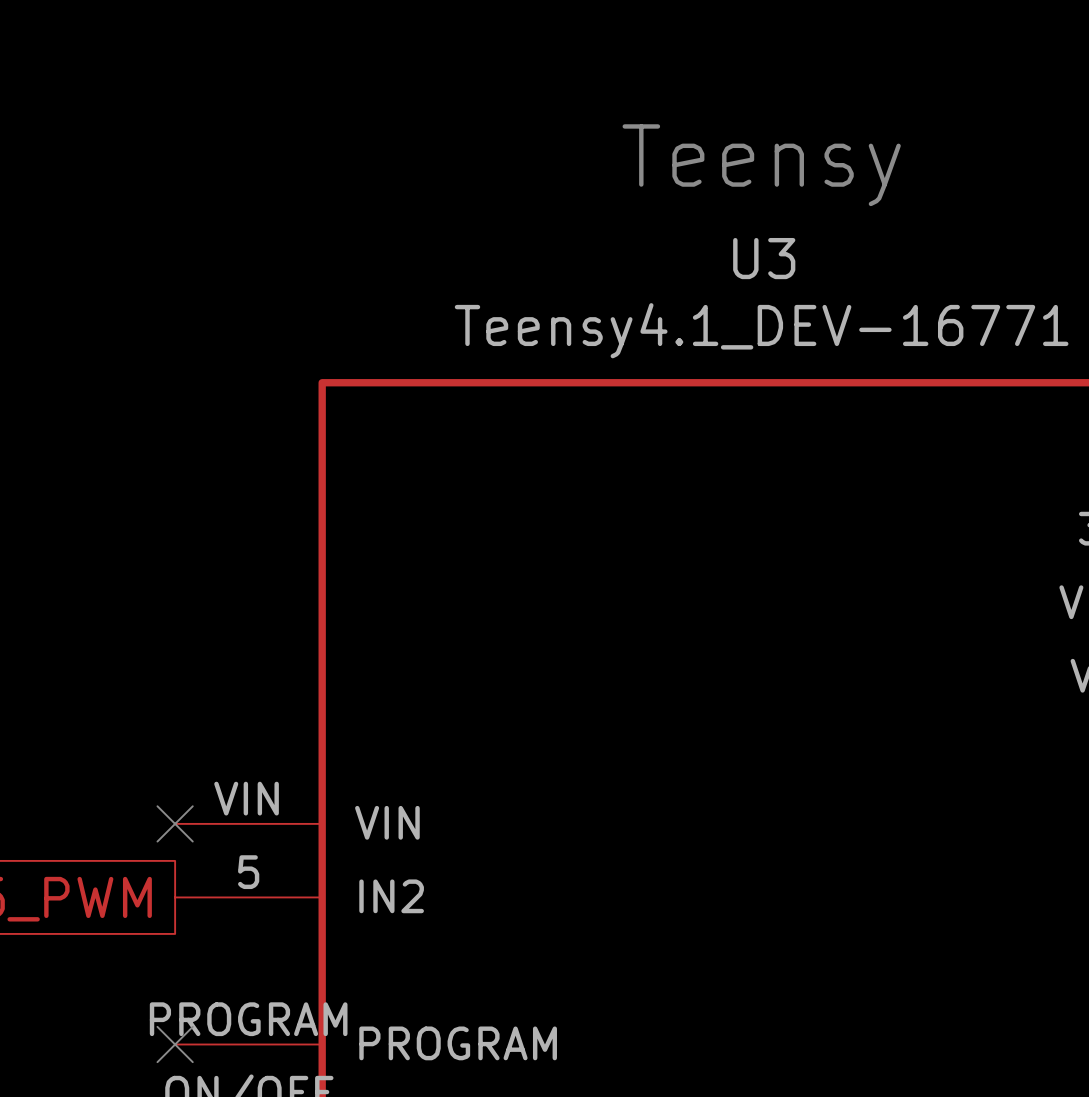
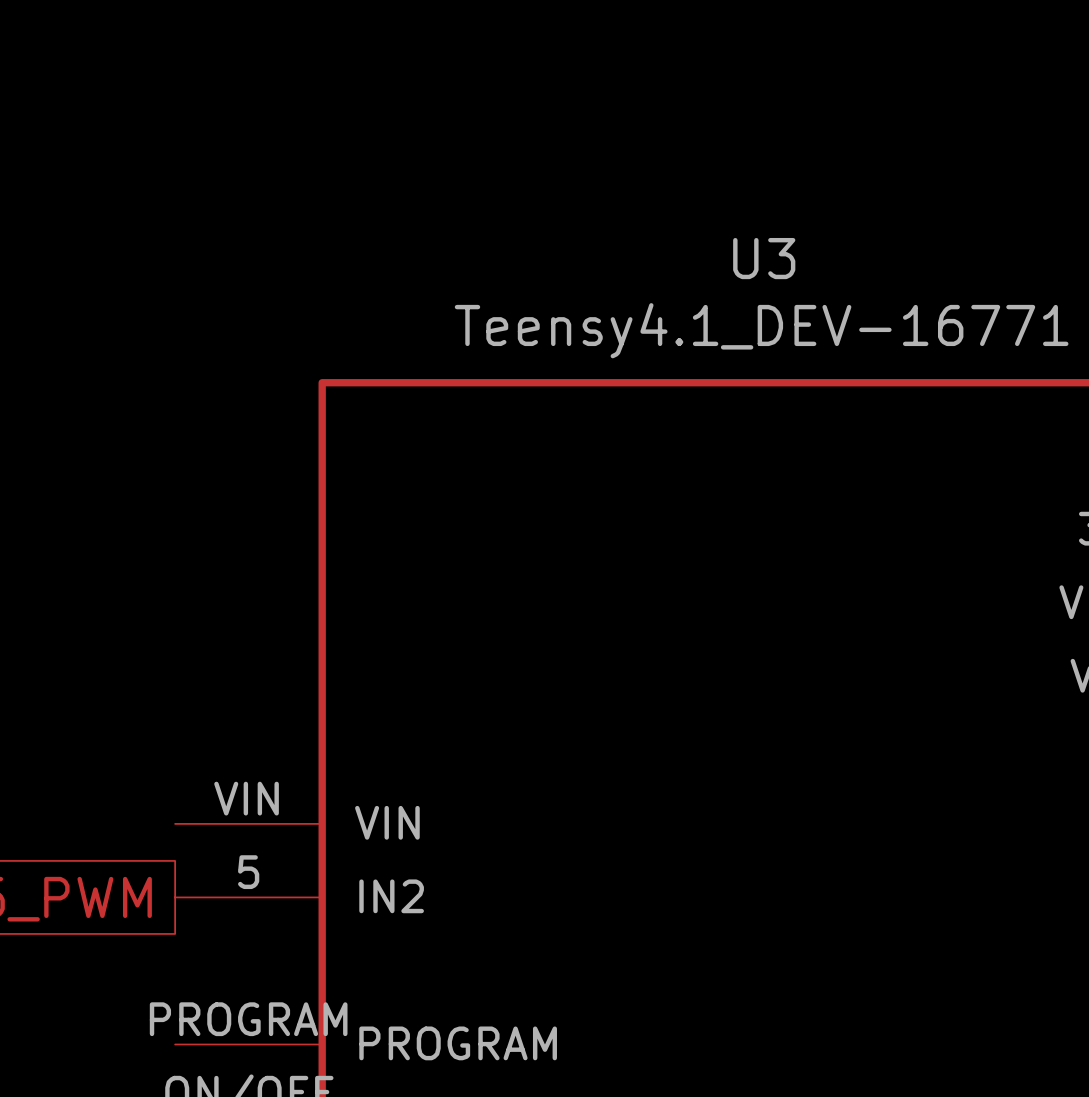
text: Teensy (761, 165) -> none
no-connect mark: (175, 823) -> none
no-connect mark: (175, 1044) -> none

